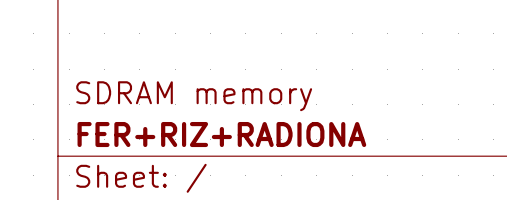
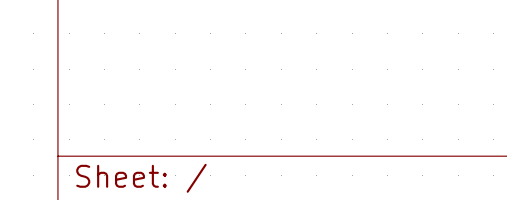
title block: SDRAM memory (194, 96) -> none
title block: FER+RIZ+RADIONA (221, 134) -> none

